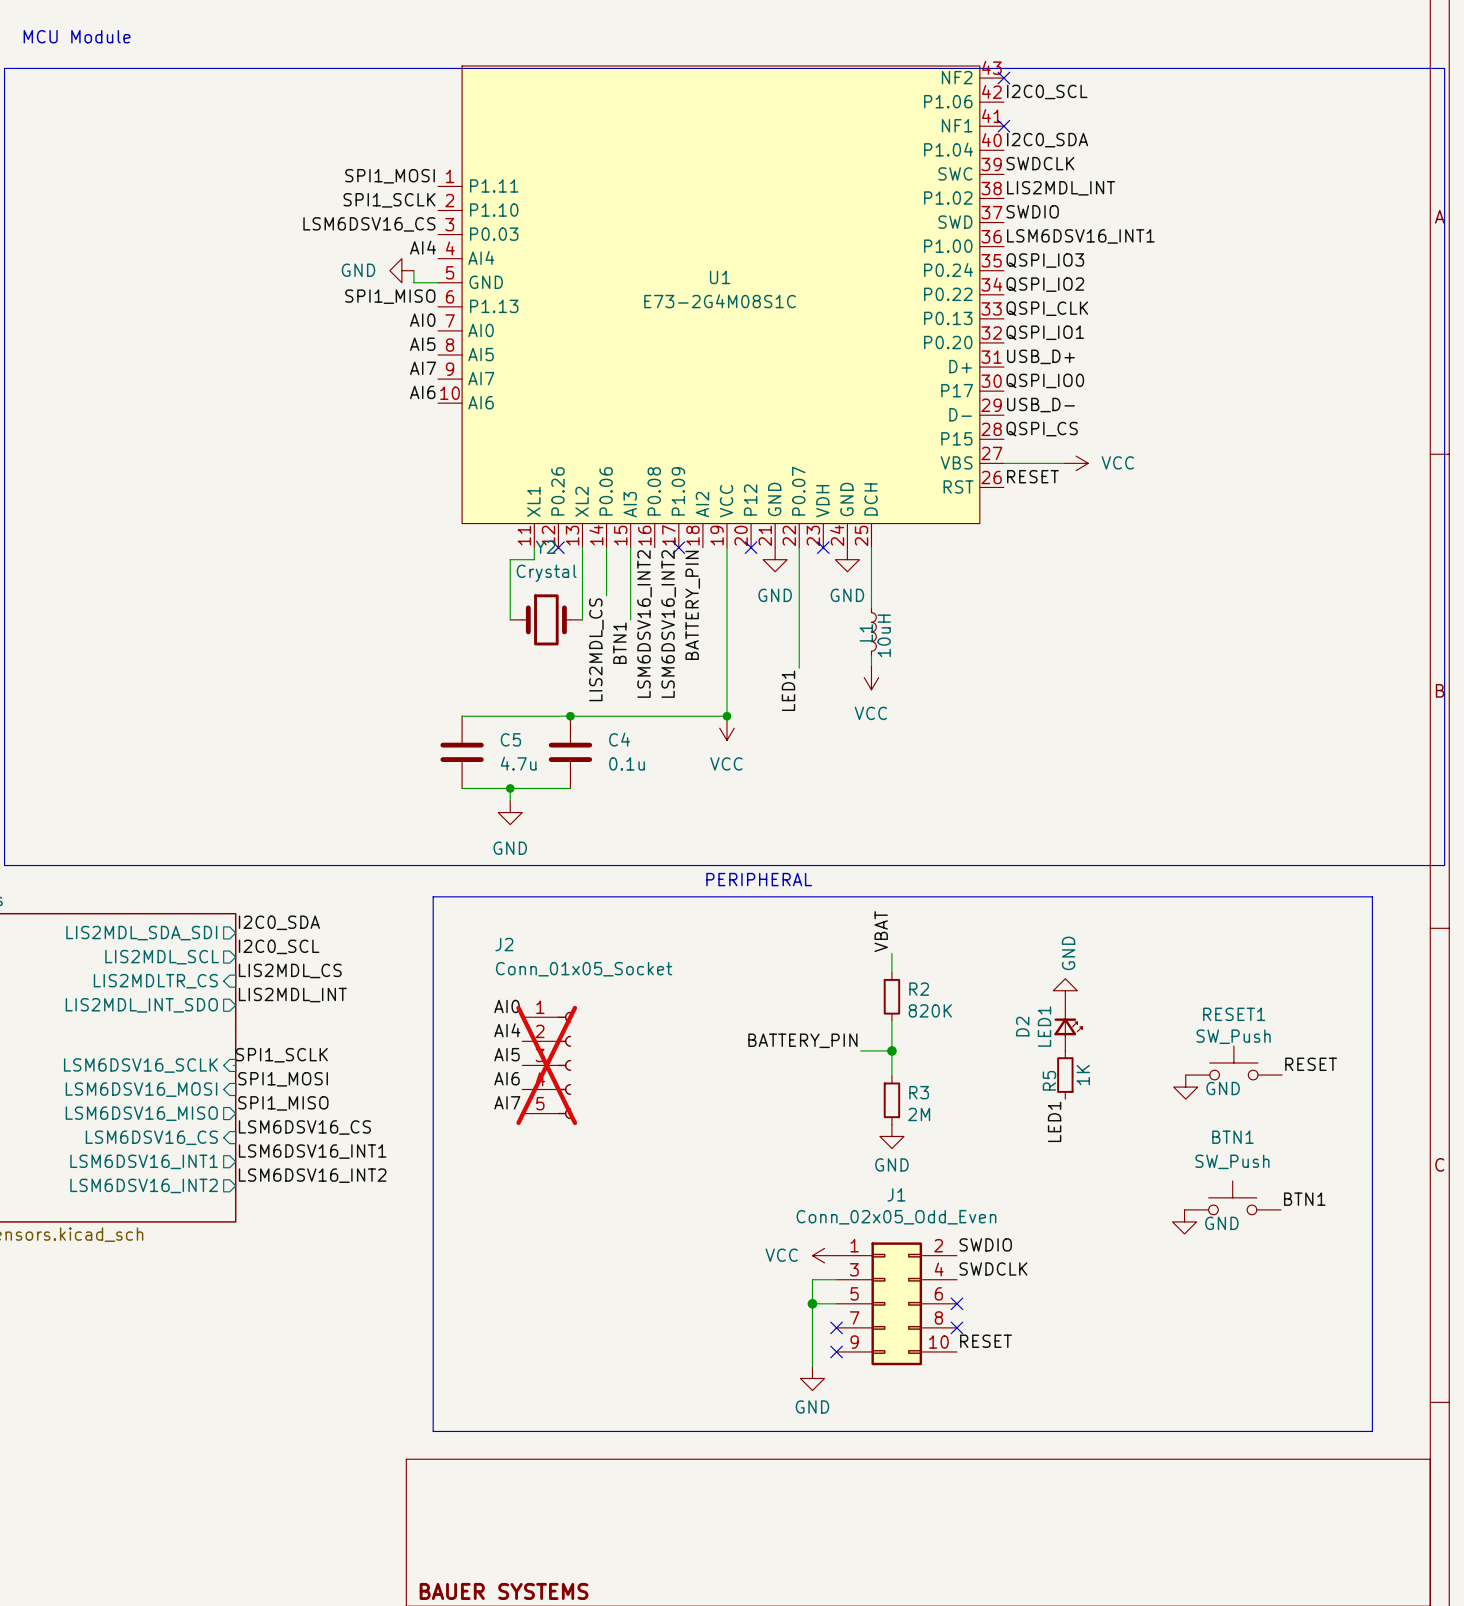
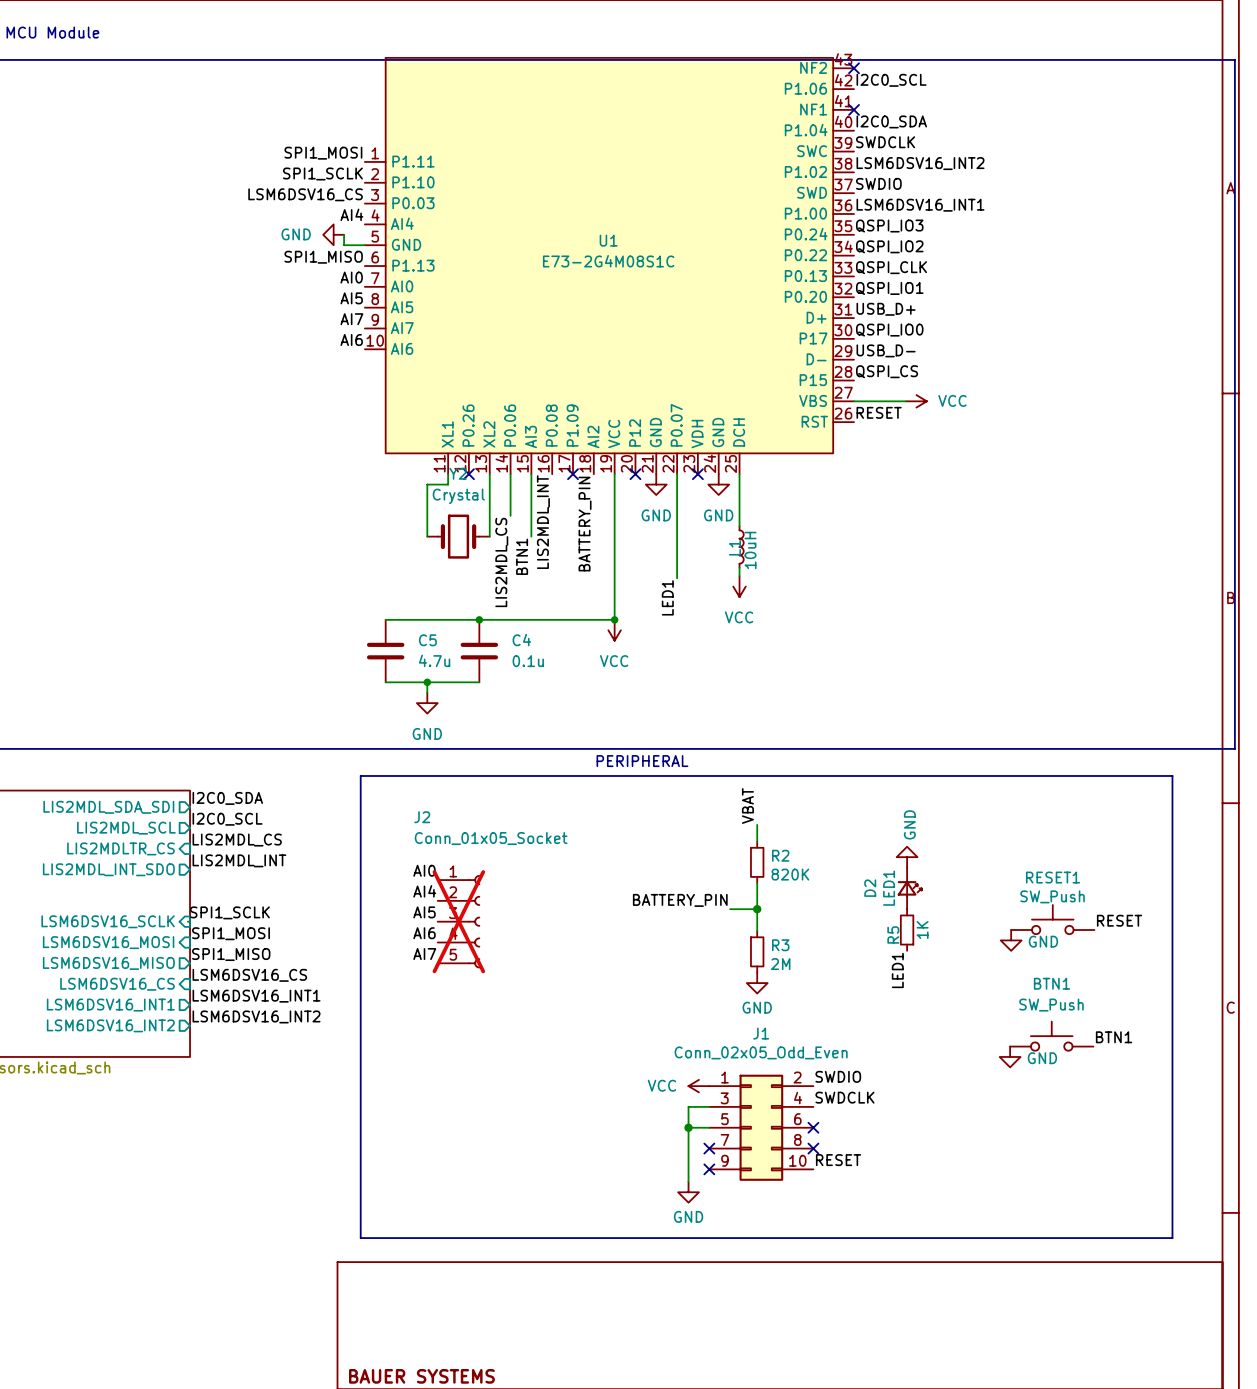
label: LIS2MDL_INT (1061, 188) -> LSM6DSV16_INT2 (920, 163)
label: LSM6DSV16_INT2 (644, 624) -> LIS2MDL_INT (543, 522)
label: LSM6DSV16_INT2 (668, 624) -> none

